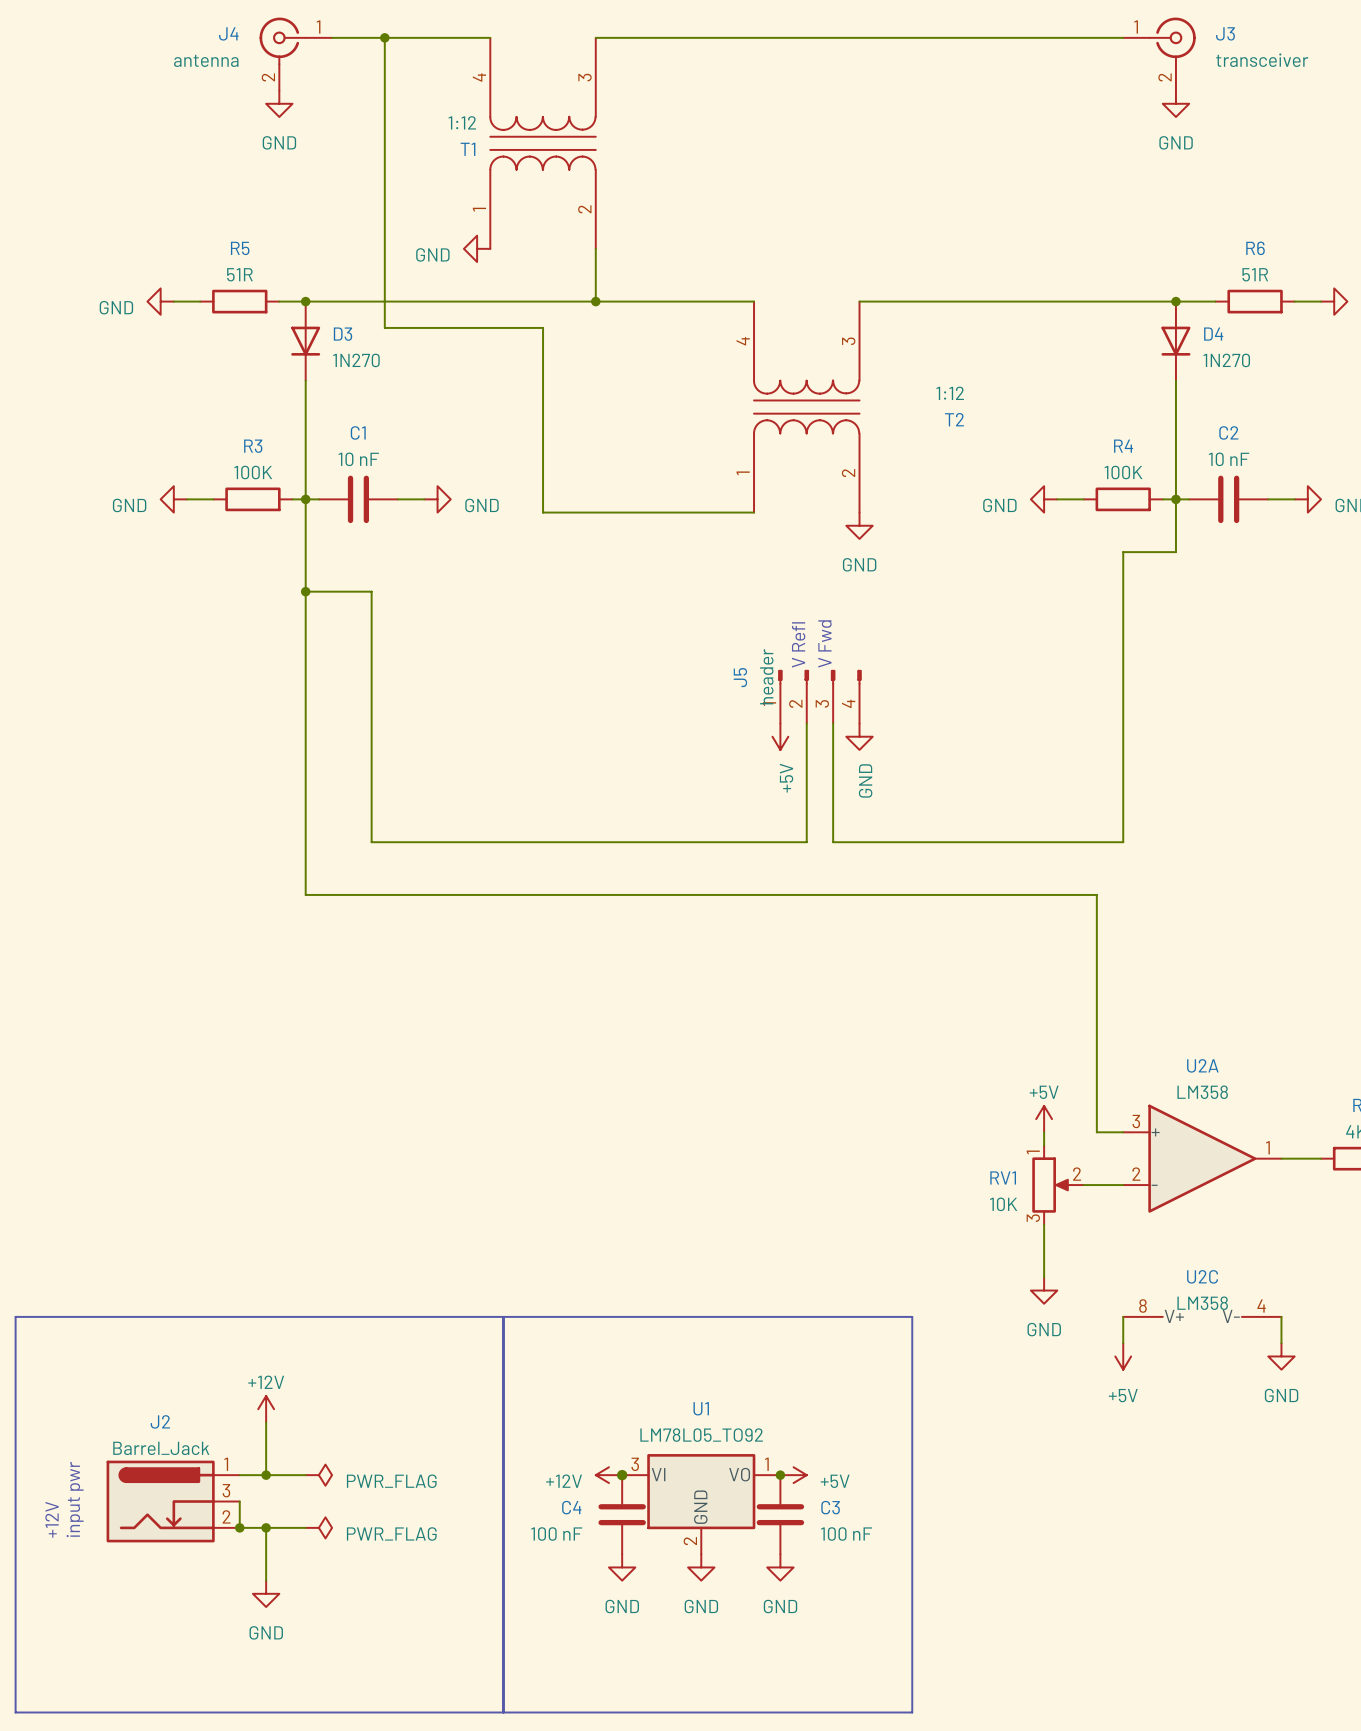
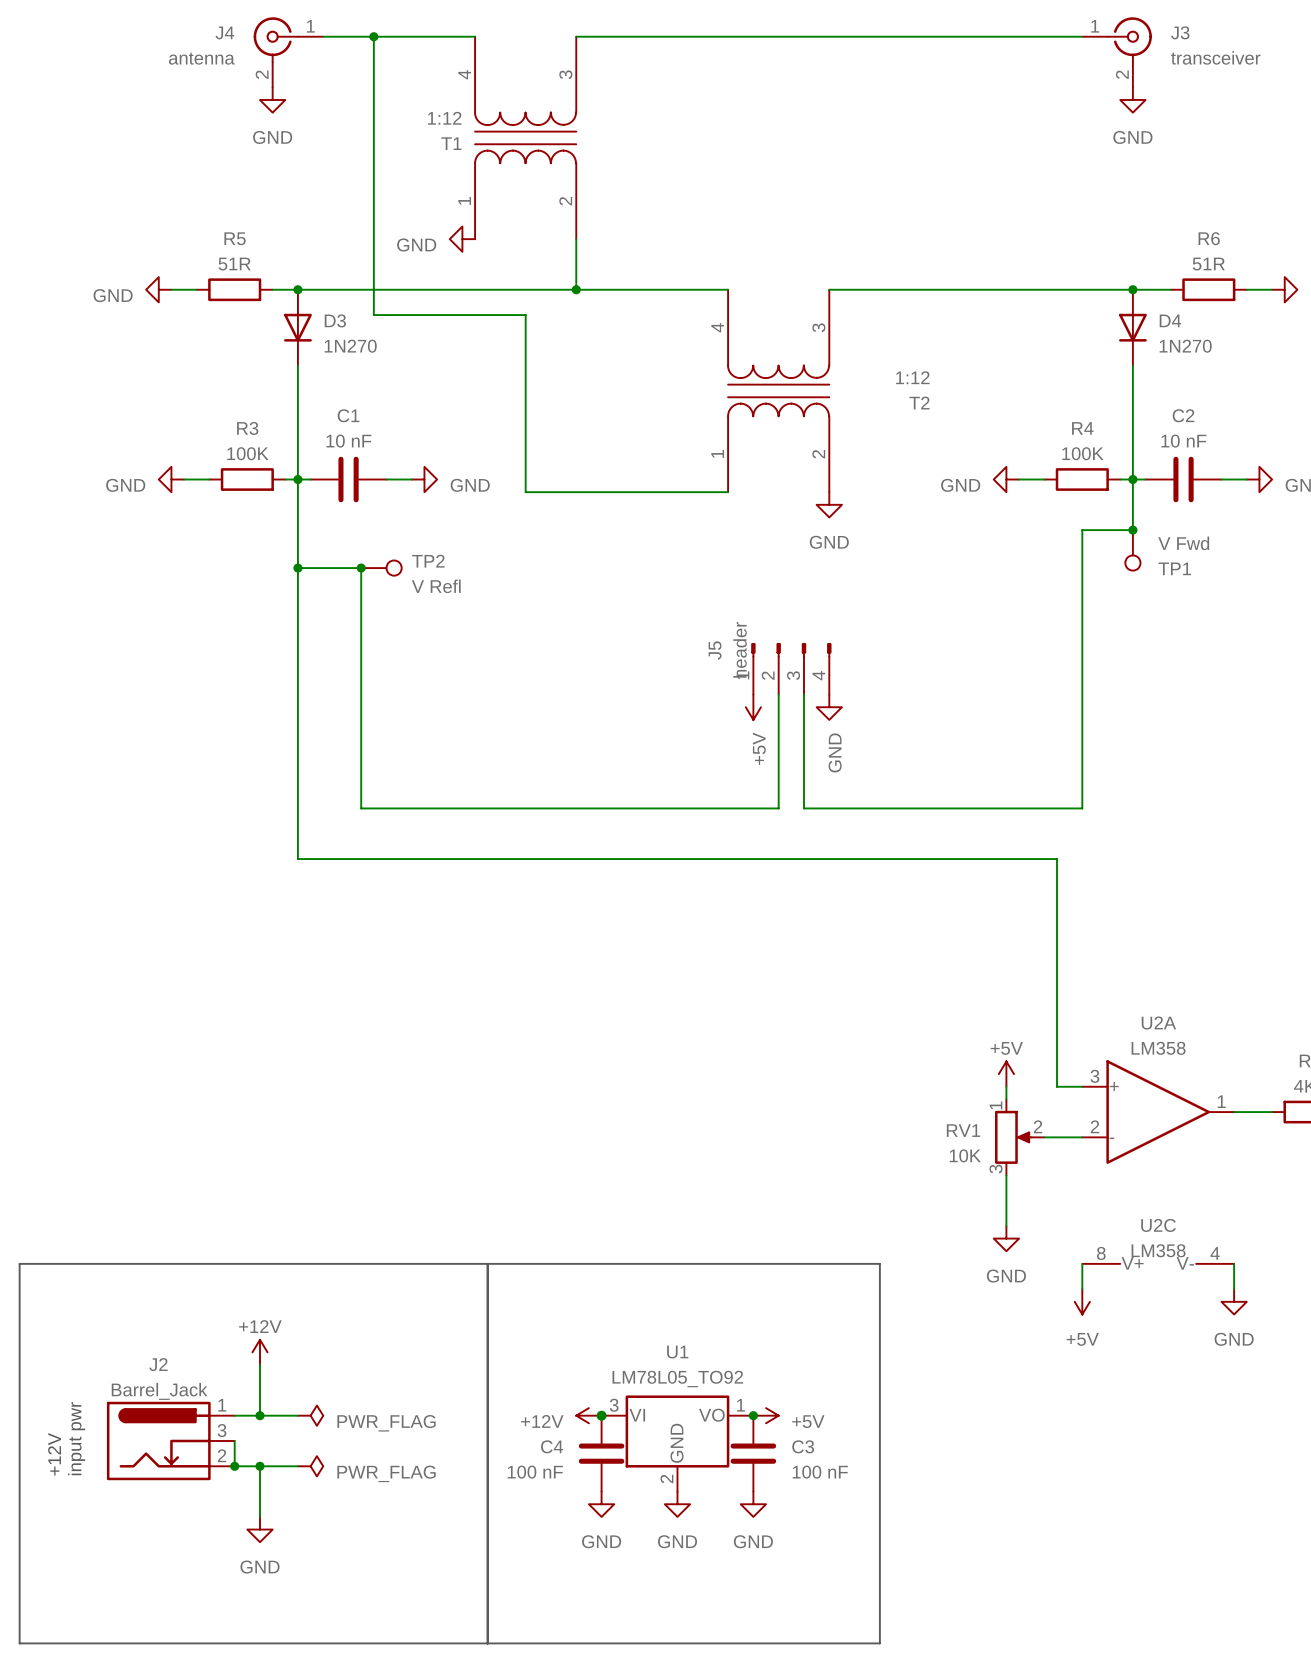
junction: none -> (1132, 530)
TP1: none -> V Fwd (1132, 550)
junction: none -> (361, 568)
TP2: none -> V Refl (381, 568)
text: V Fwd (825, 643) -> none
text: V Refl (798, 644) -> none

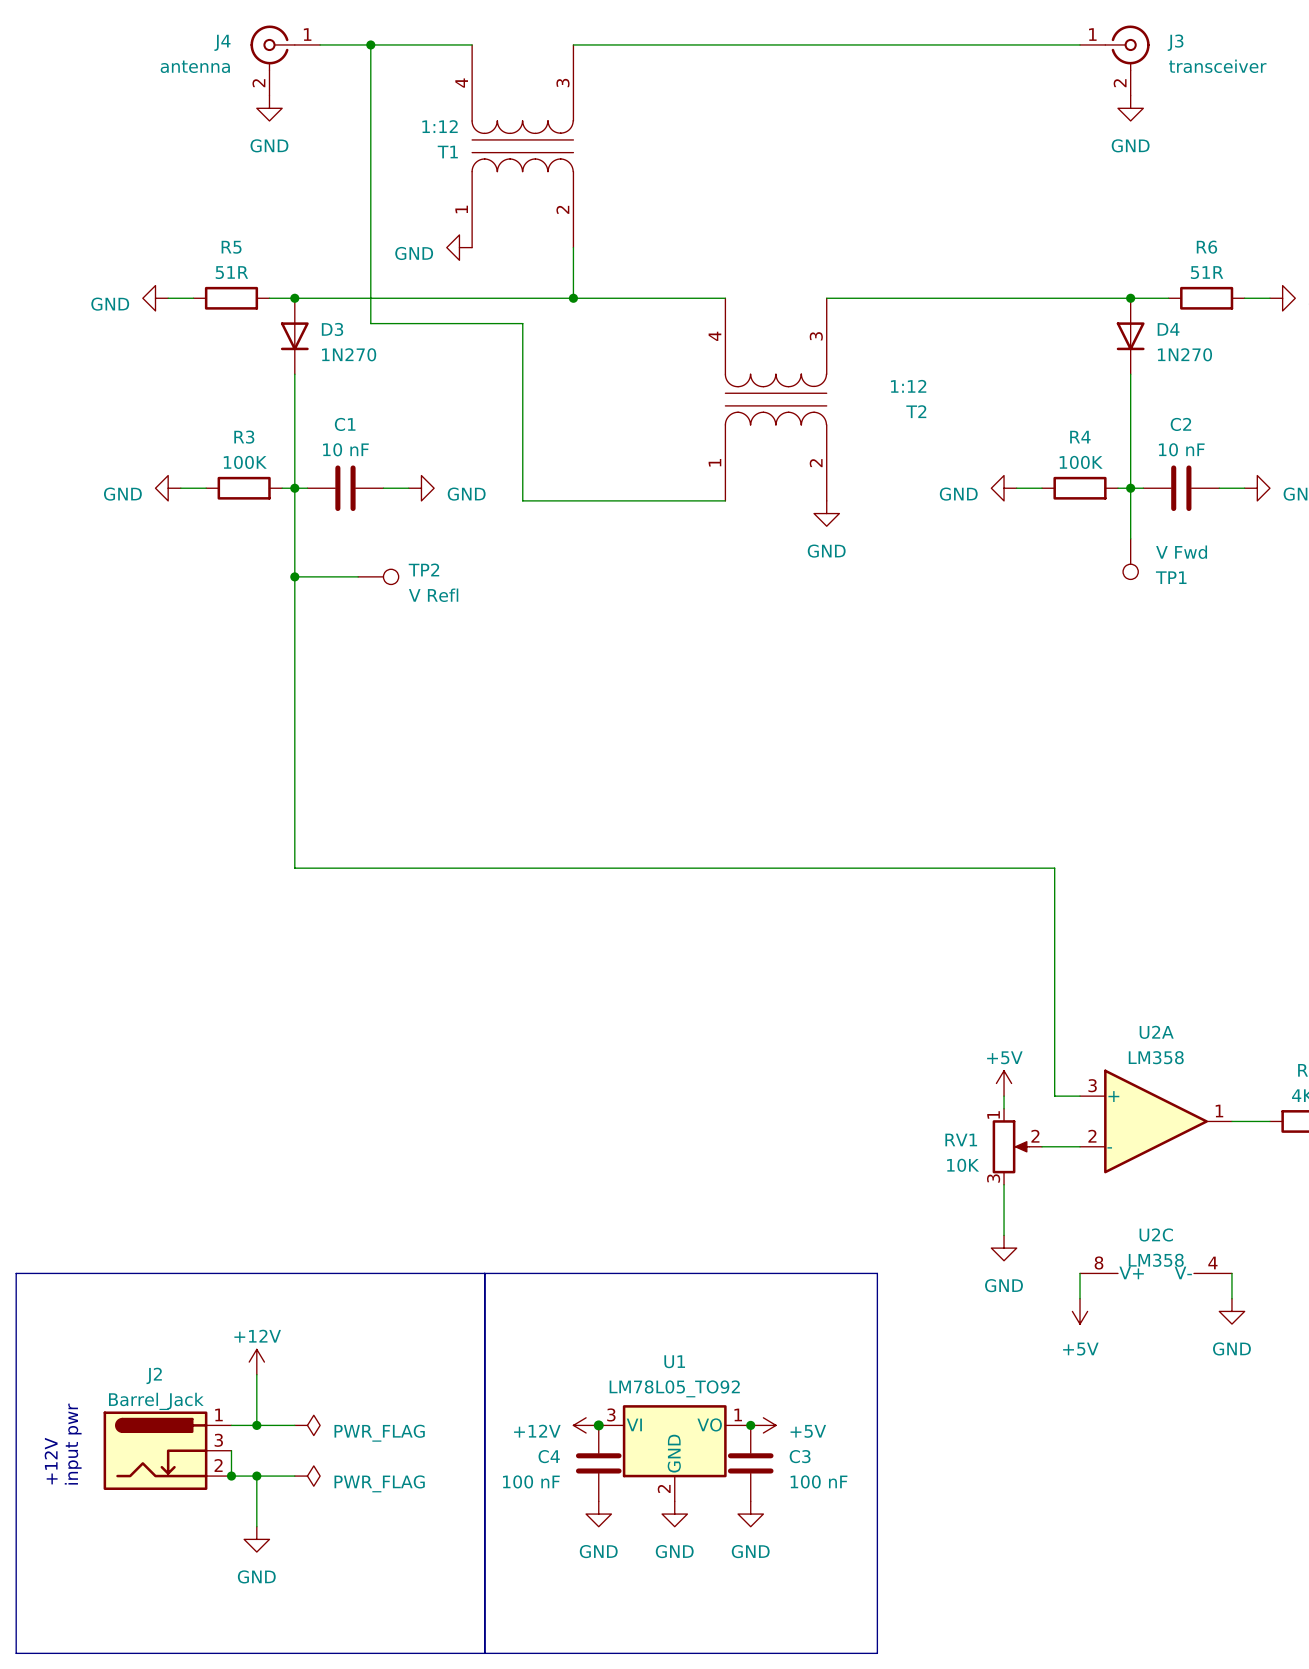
wire: (1132, 530) (1082, 530) (1082, 808) (803, 808) (803, 694) -> none
junction: (1132, 530) -> none
wire: (361, 568) (361, 808) (778, 808) (778, 694) -> none
junction: (361, 568) -> none
J5: header (791, 668) -> none
power symbol: +5V (753, 707) -> none
power symbol: GND (829, 707) -> none

